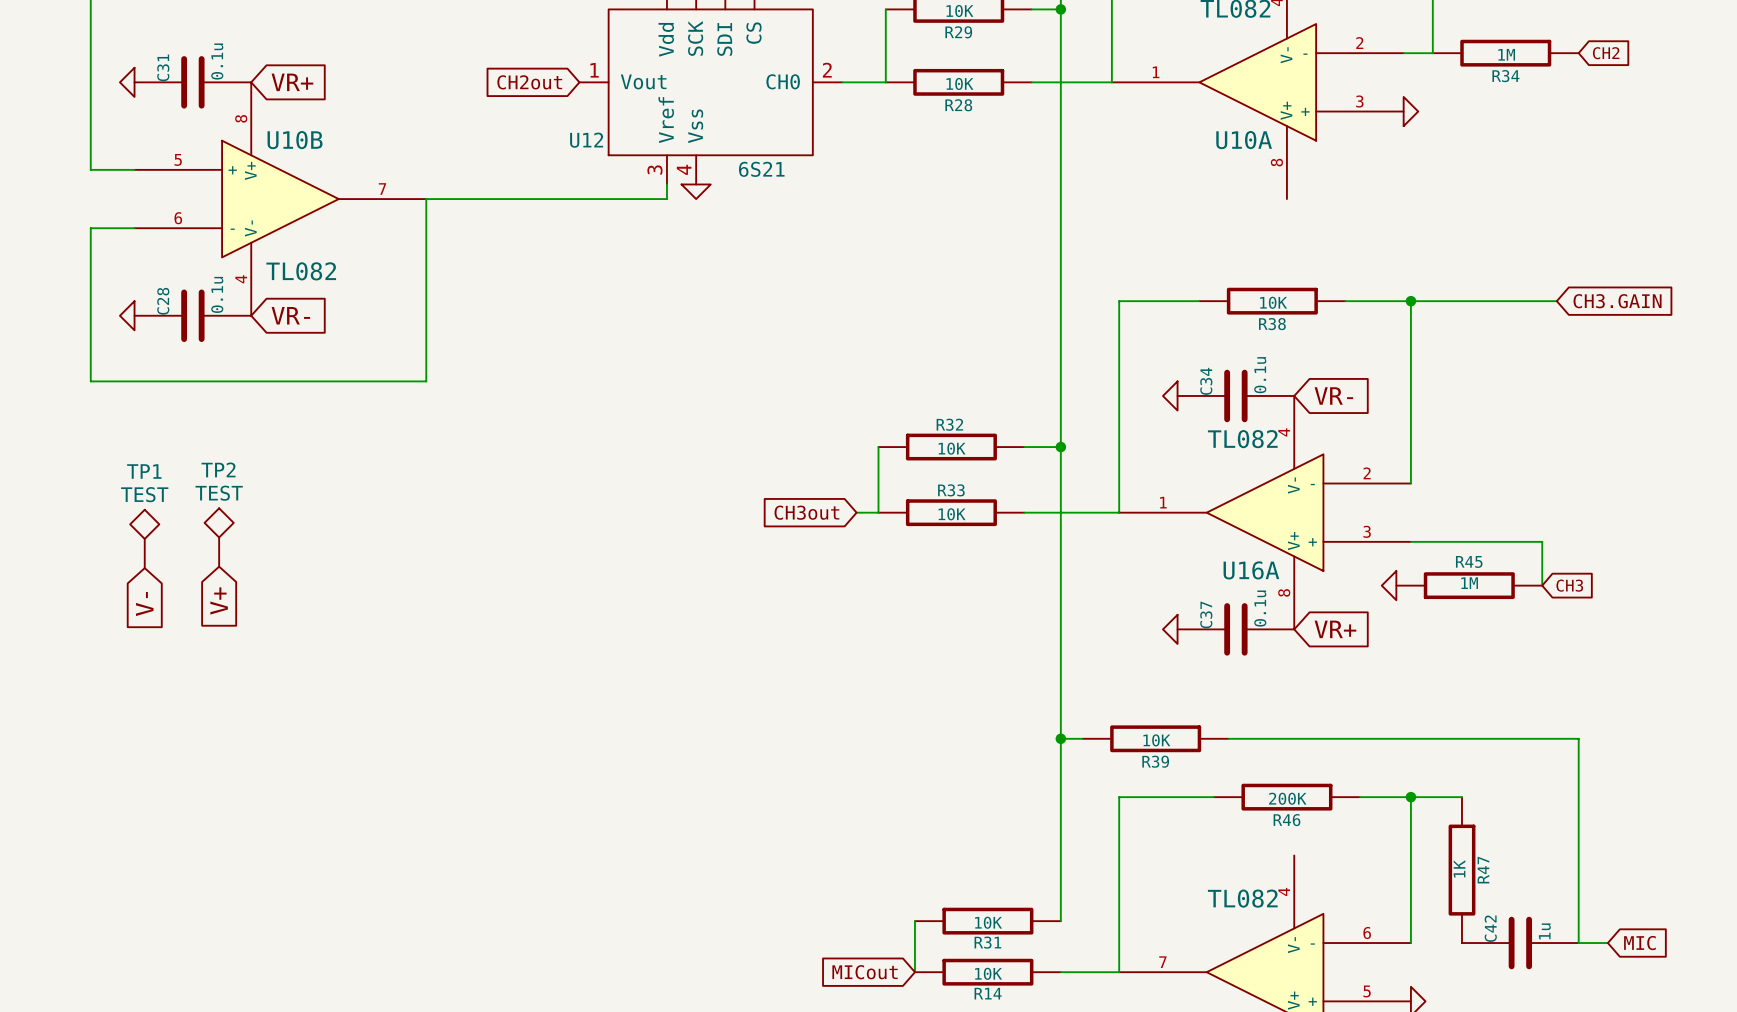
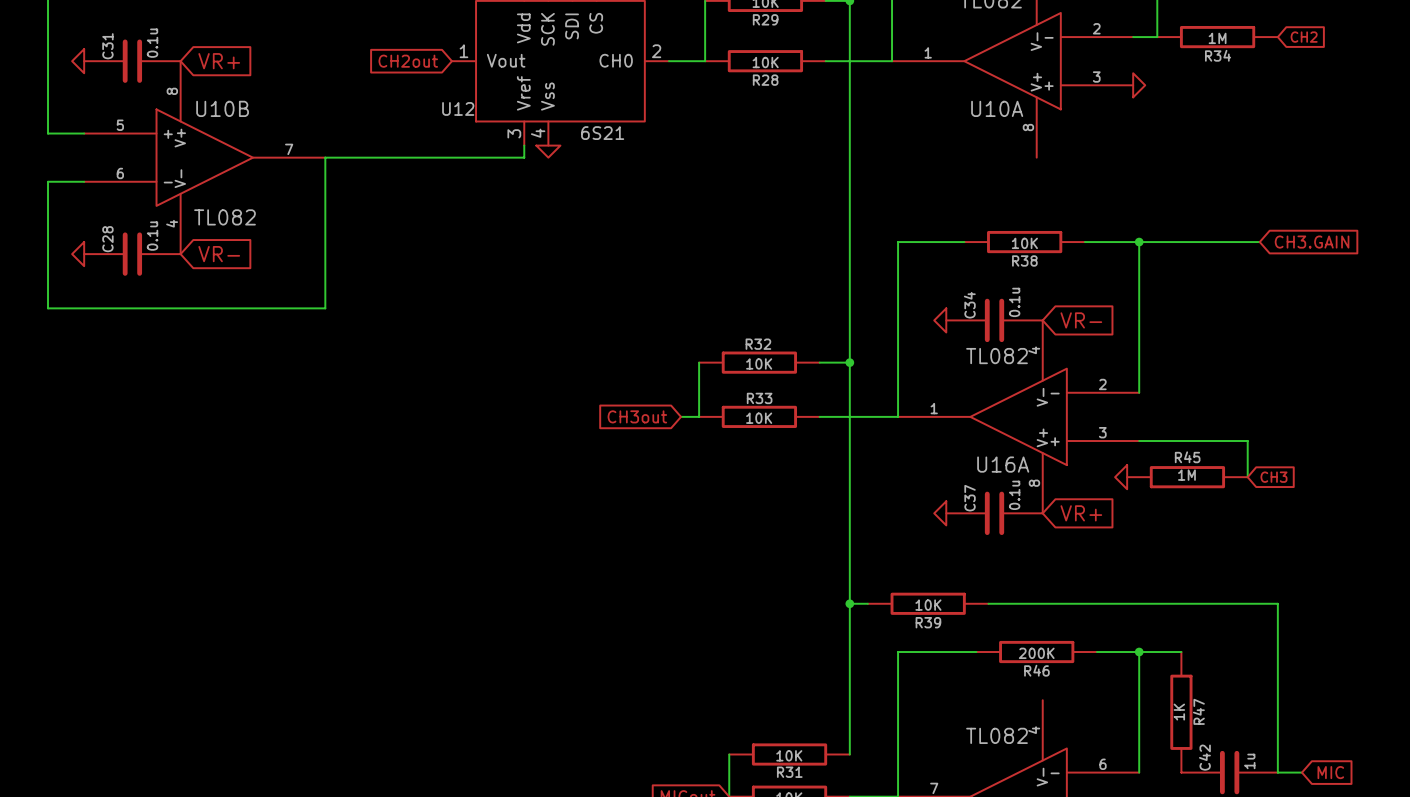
TP2: TEST (219, 537) -> none
TP1: TEST (144, 538) -> none
global label: V+ (219, 600) -> none
global label: V- (144, 604) -> none

